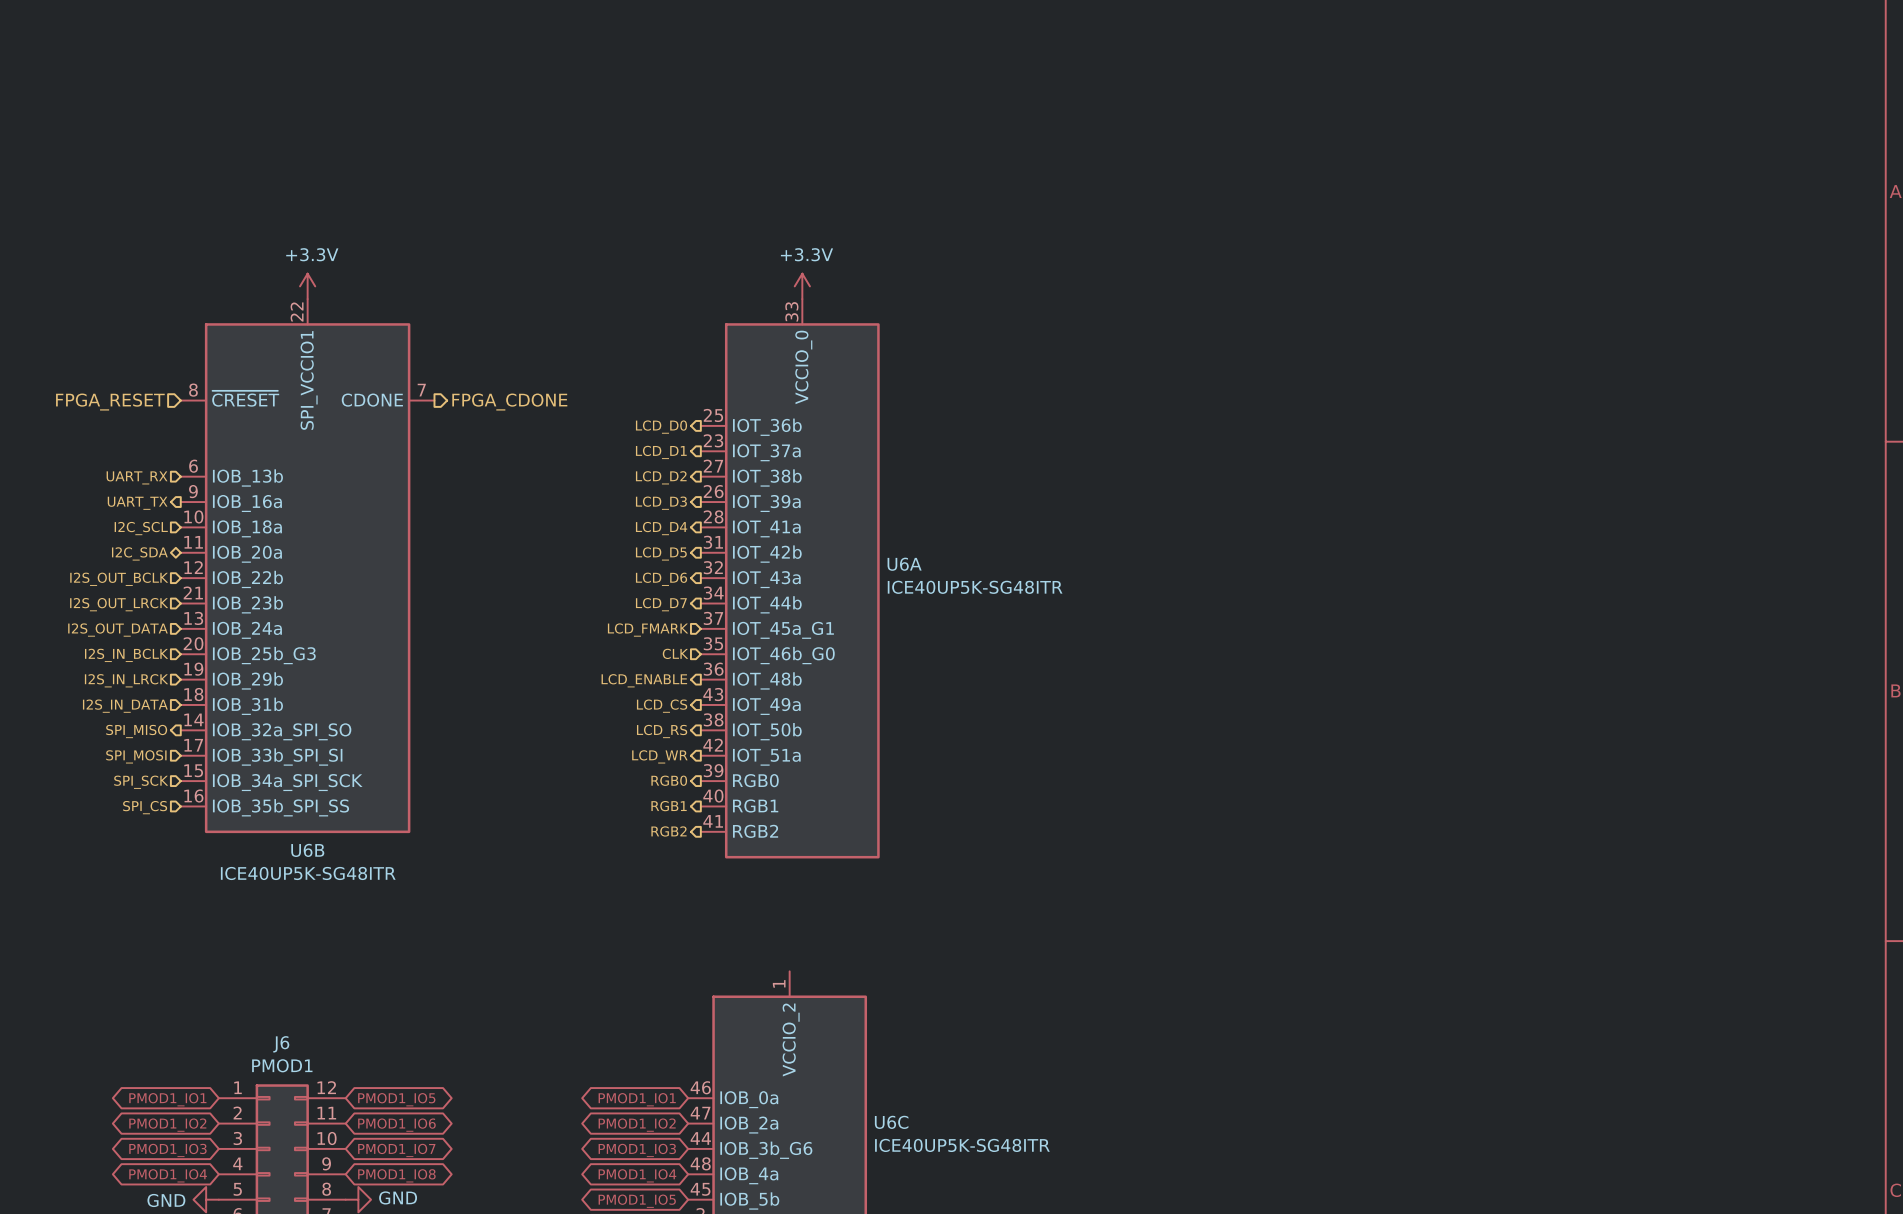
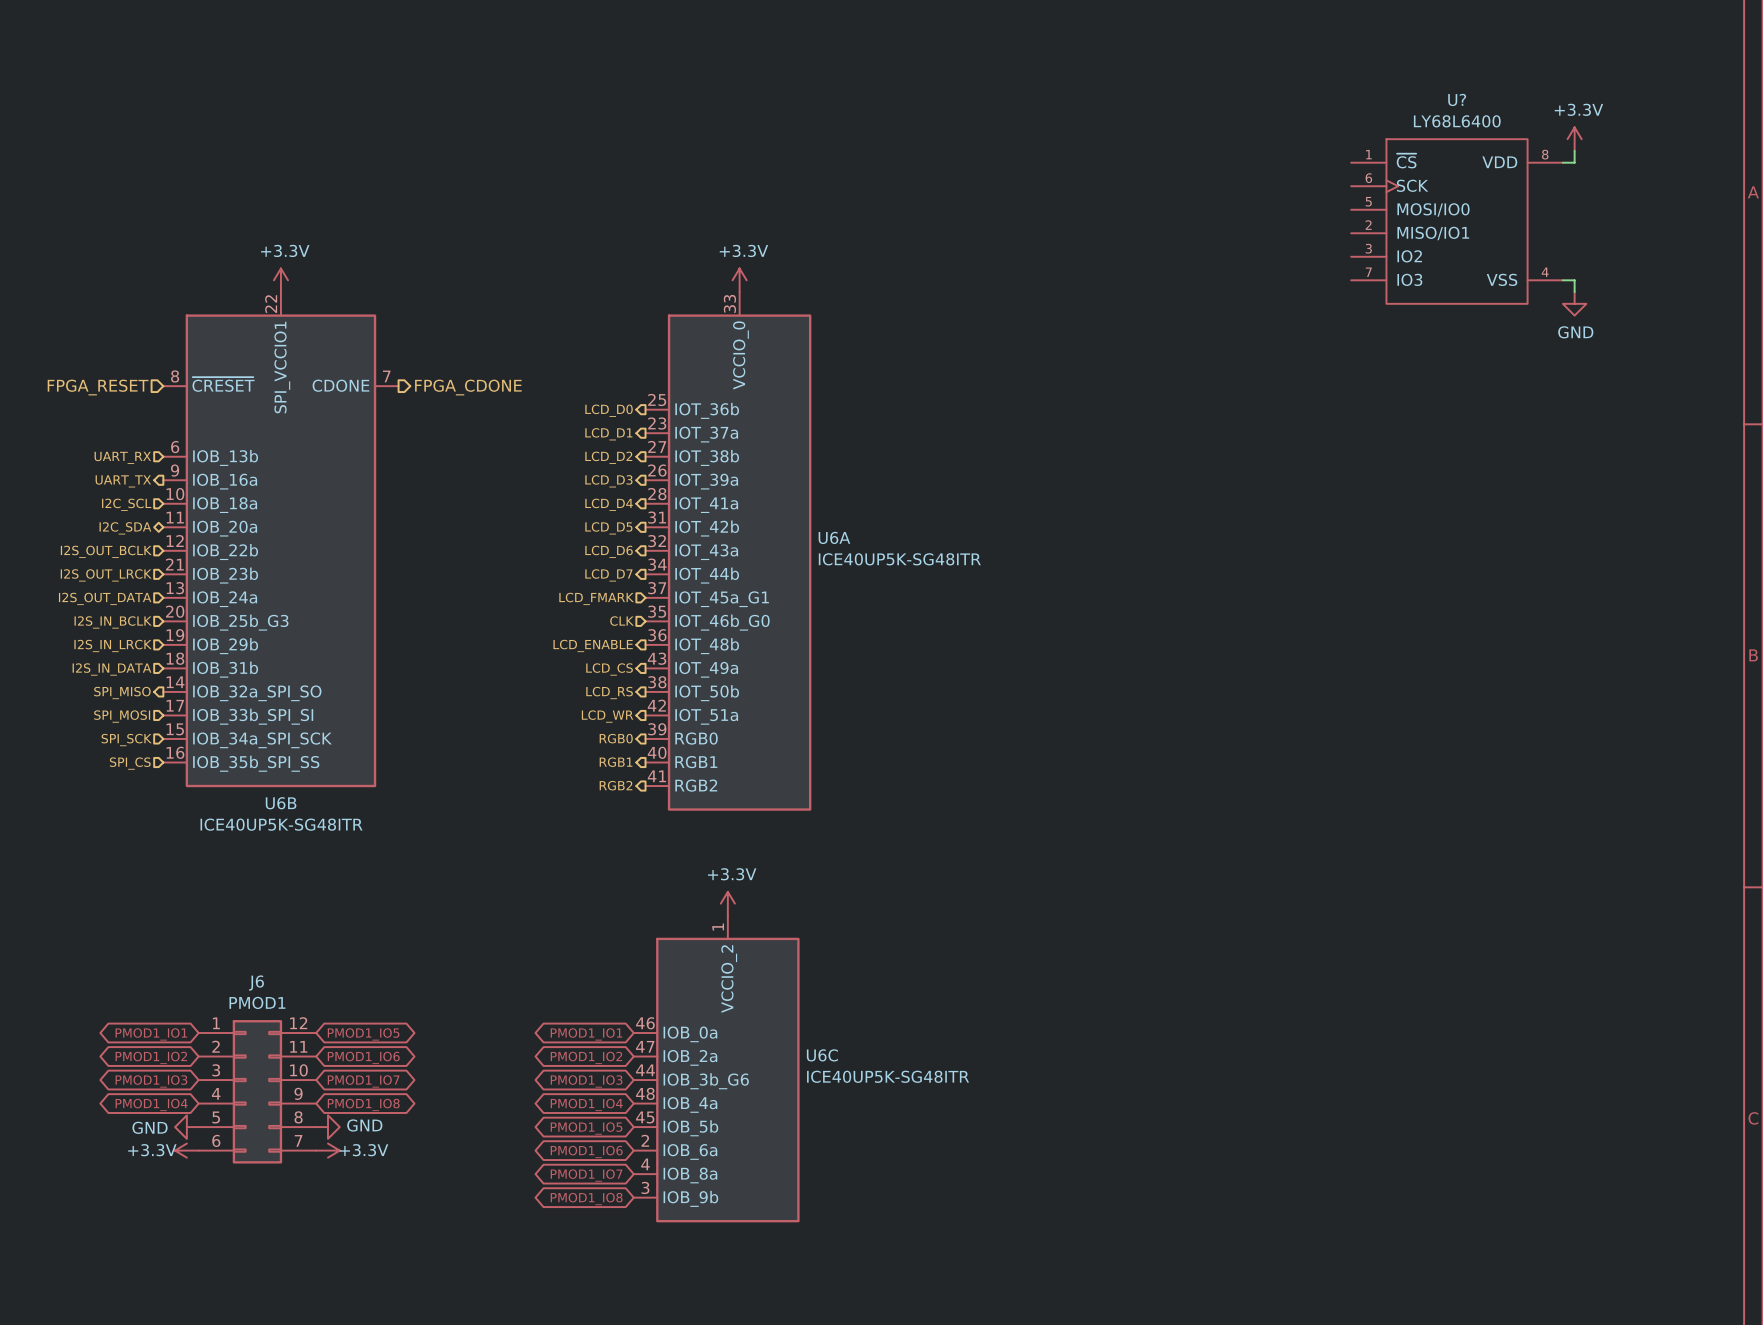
power symbol: none -> +3.3V (1574, 139)
wire: none -> (1574, 150) (1574, 162) (1562, 162)
U?: none -> LY68L6400 (1457, 221)
wire: none -> (1562, 280) (1574, 280) (1574, 292)
power symbol: none -> GND (1574, 303)
power symbol: none -> +3.3V (727, 903)

